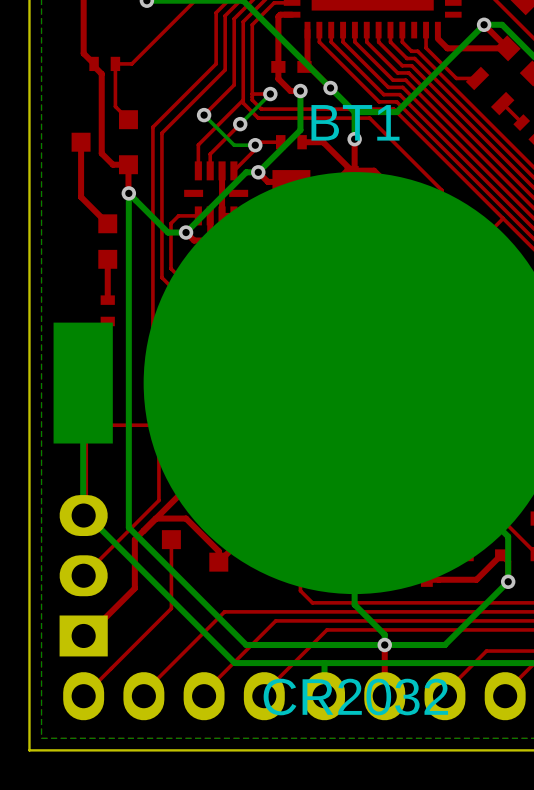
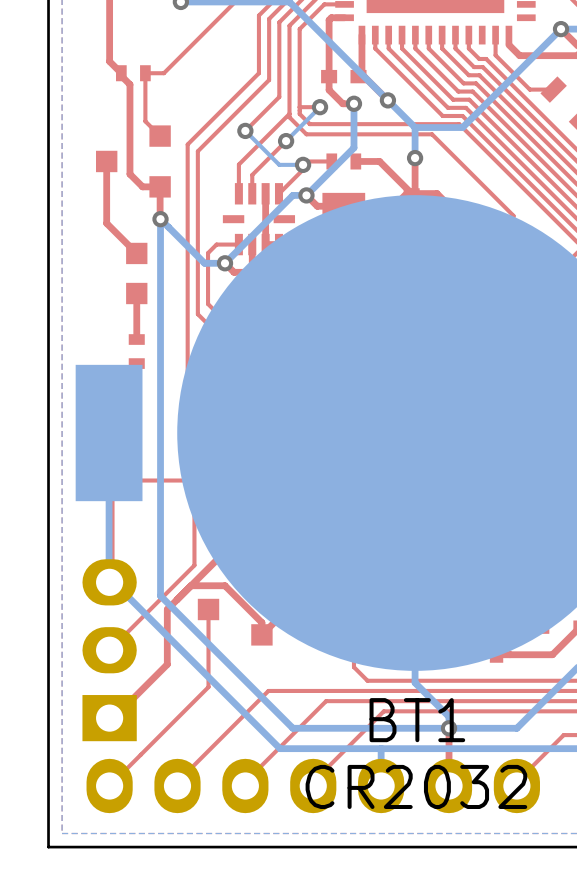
BT1 name position: BT1 (355, 122) -> BT1 (417, 720)

